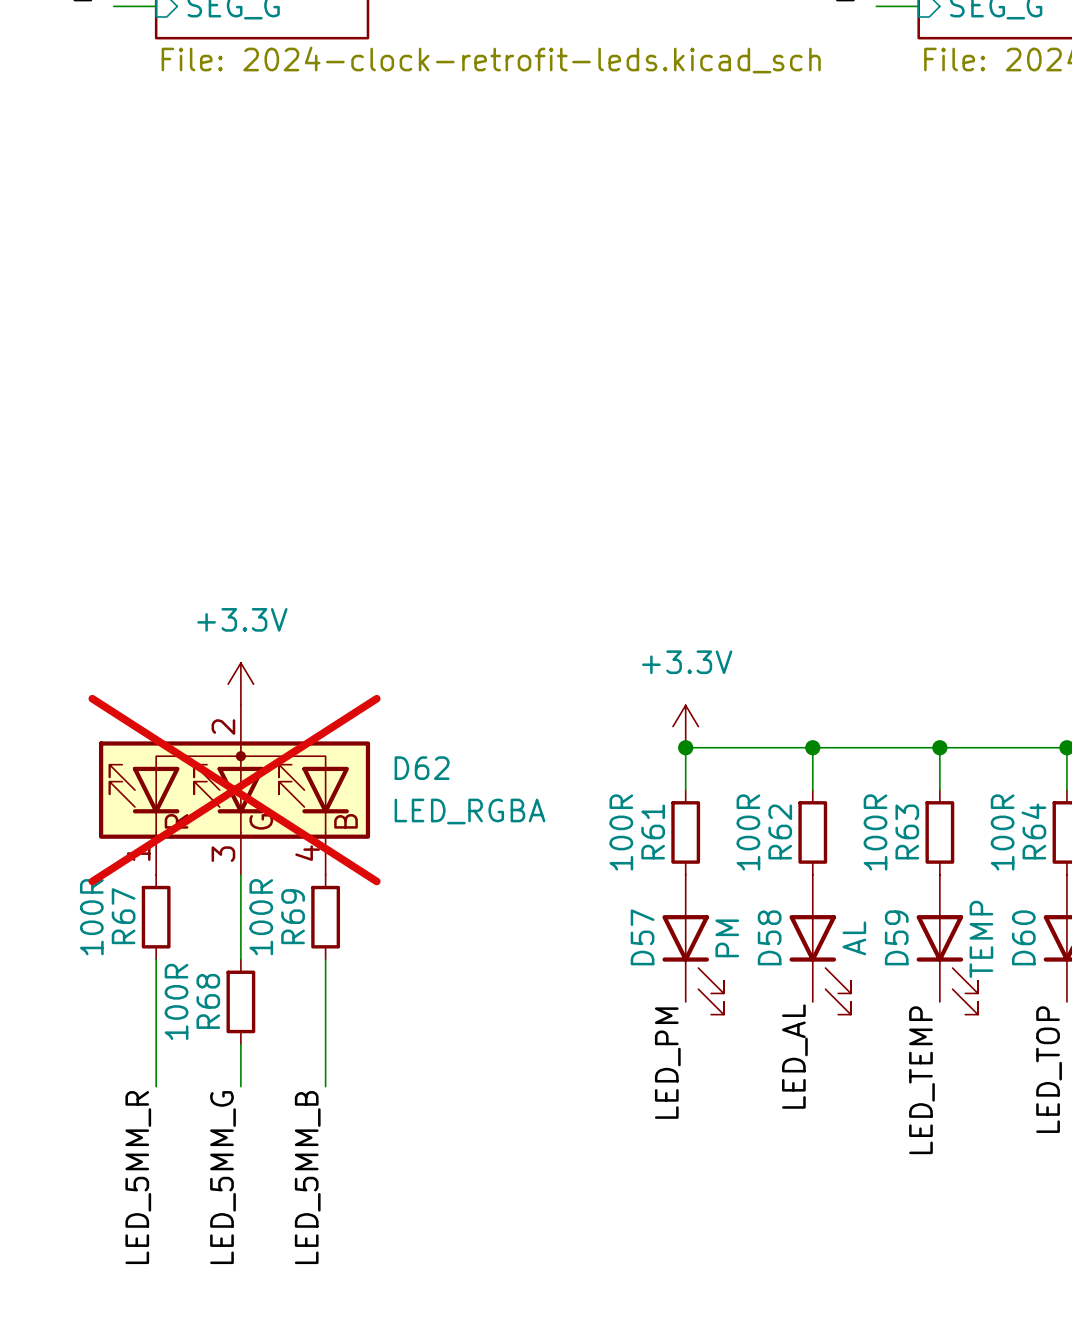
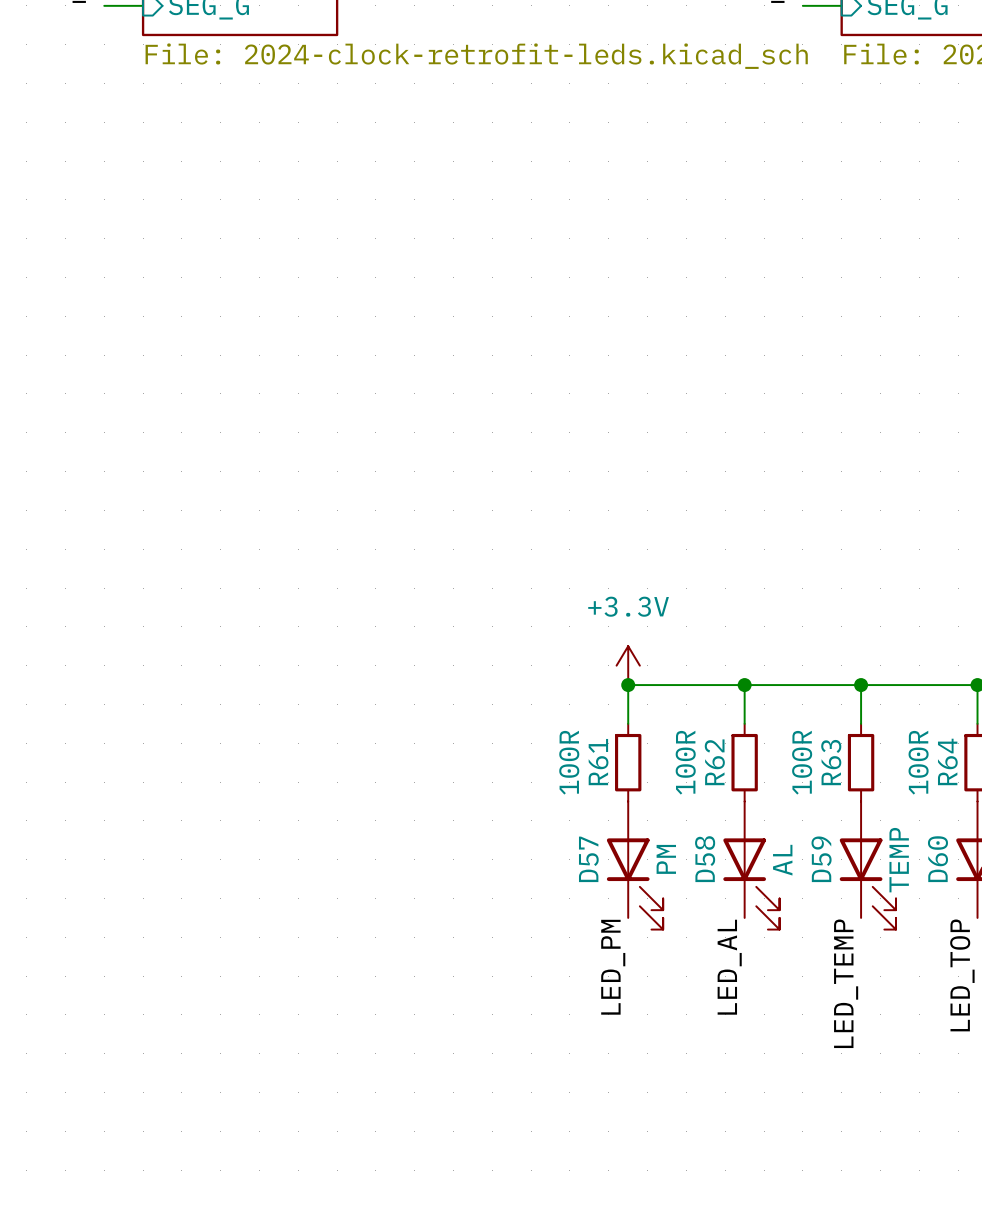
power symbol: +3.3V (240, 684) -> none
D62: LED_RGBA (234, 790) -> none
wire: (240, 874) (240, 959) -> none
R67: 100R (156, 917) -> none
R69: 100R (325, 917) -> none
wire: (156, 959) (156, 1086) -> none
wire: (325, 959) (325, 1086) -> none
R68: 100R (240, 1001) -> none
wire: (240, 1044) (240, 1086) -> none
label: LED_5MM_R (138, 1177) -> none
label: LED_5MM_G (223, 1177) -> none
label: LED_5MM_B (307, 1177) -> none

